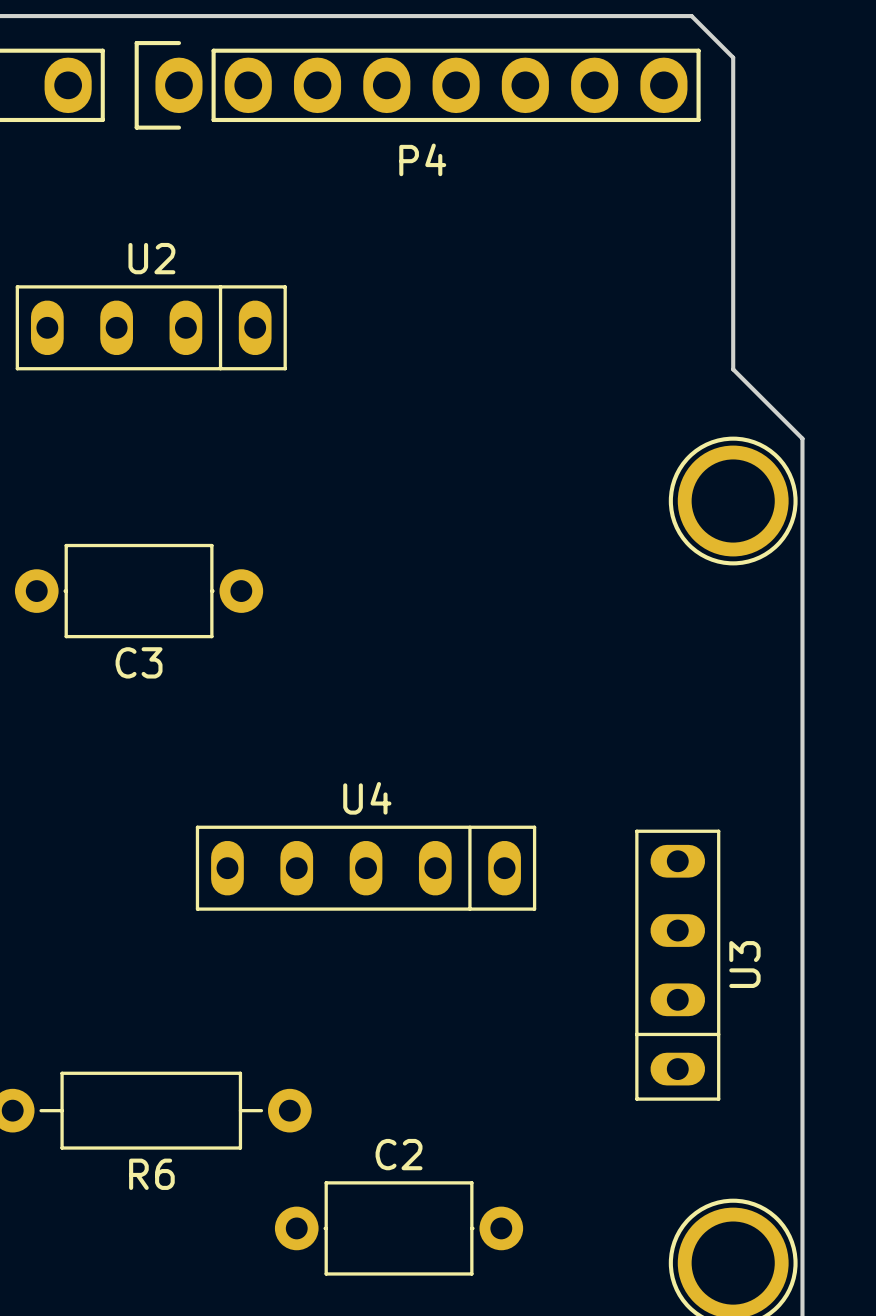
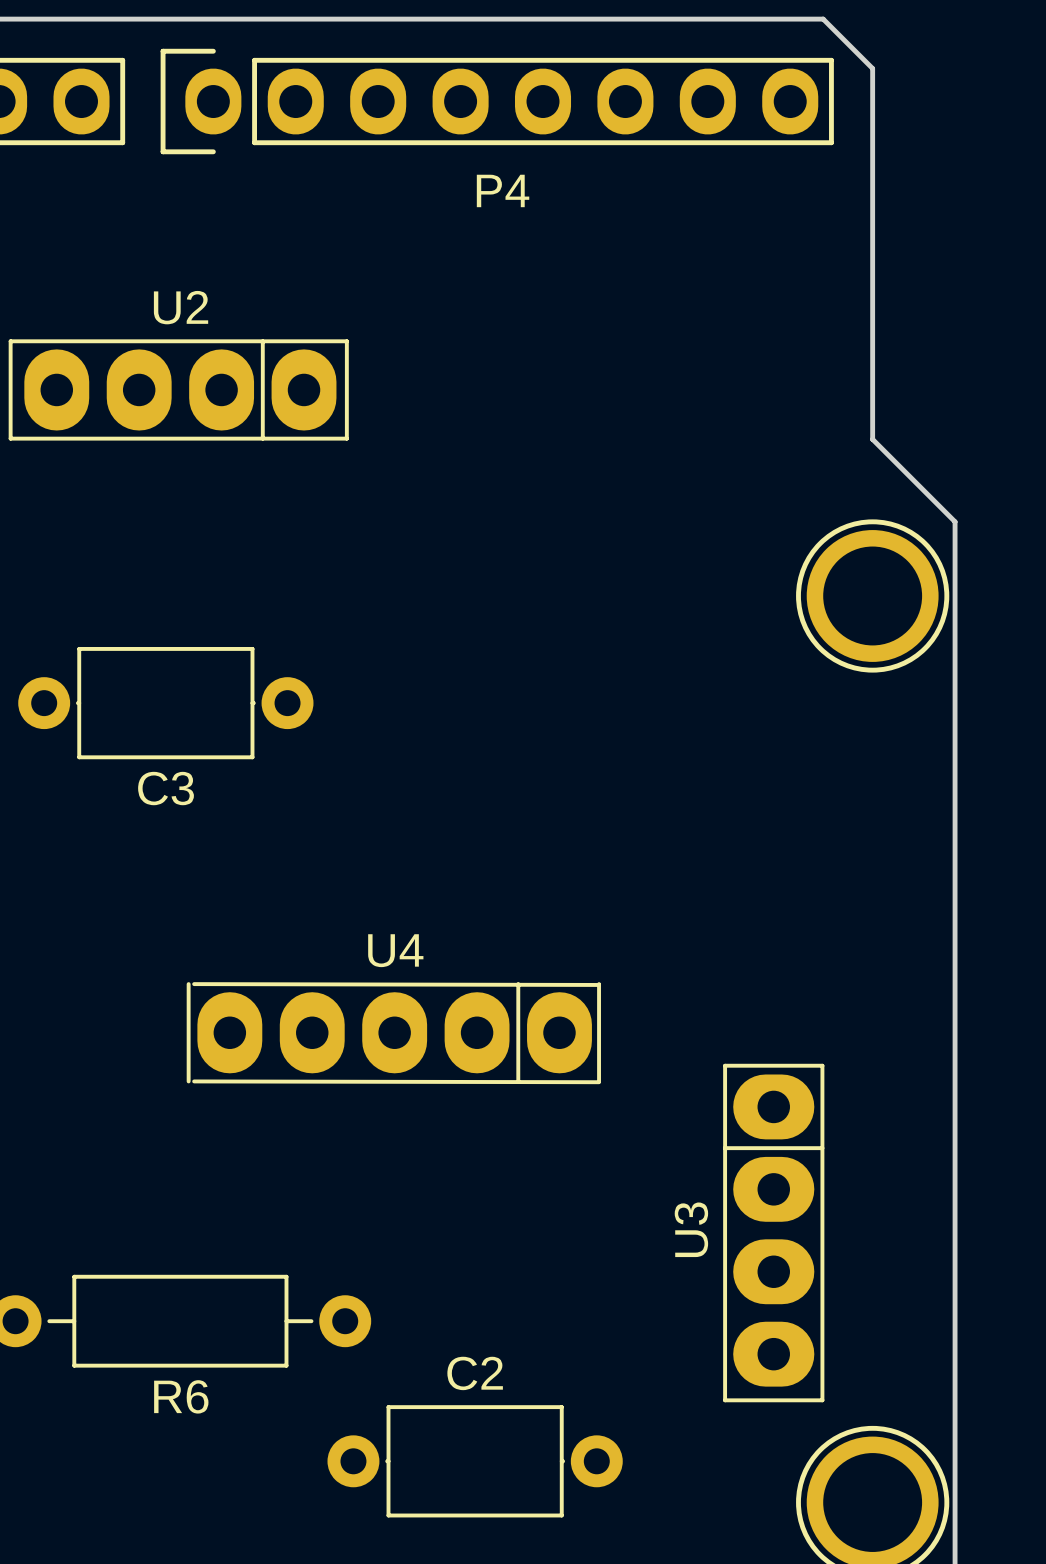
U2 footprint: [15, 285, 287, 371] -> [8, 339, 349, 441]
U4 footprint: [195, 825, 537, 911] -> [186, 982, 601, 1085]
U3 footprint: [635, 829, 721, 1101] -> [723, 1063, 825, 1403]
U3 name position: U3 (744, 964) -> U3 (691, 1229)

